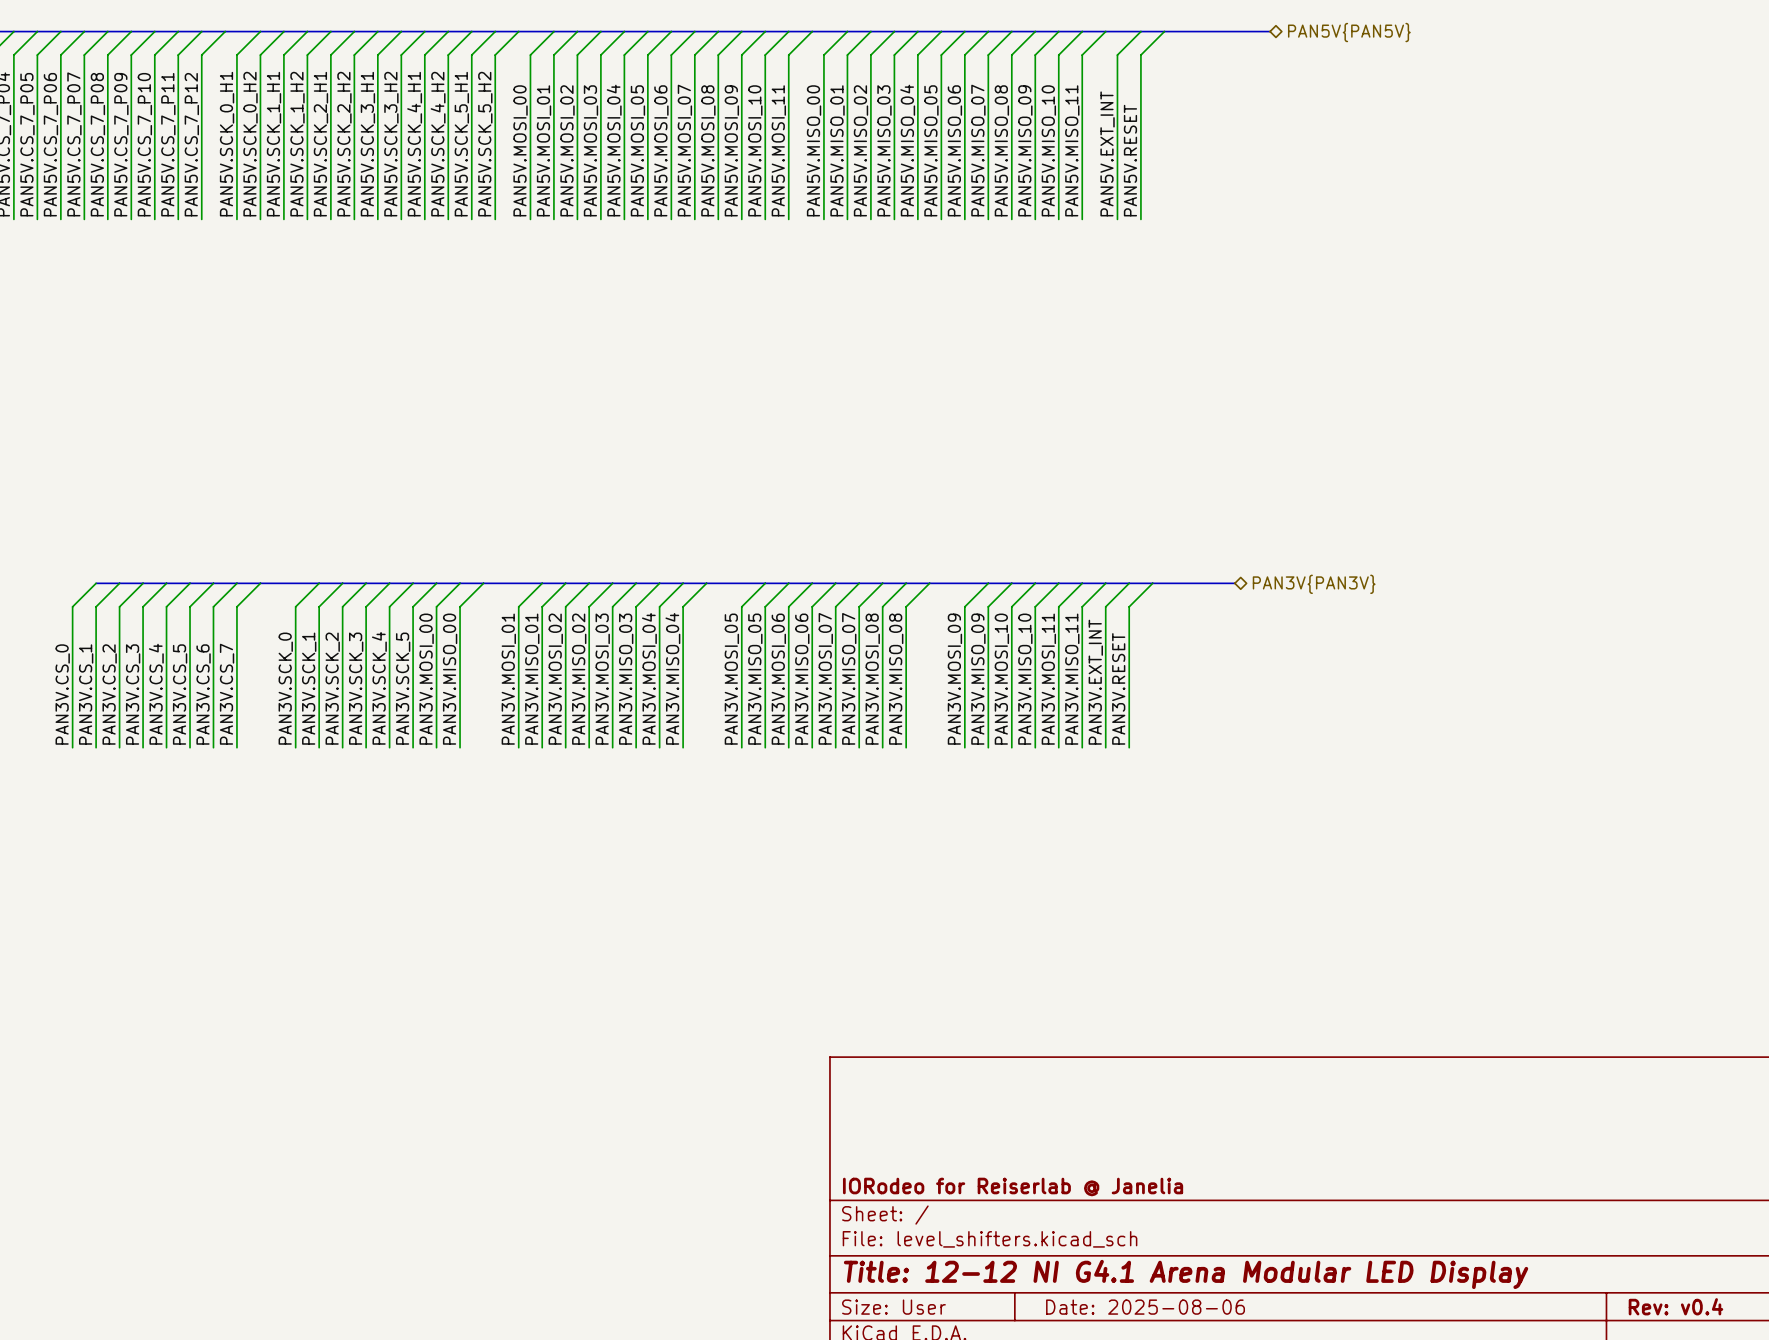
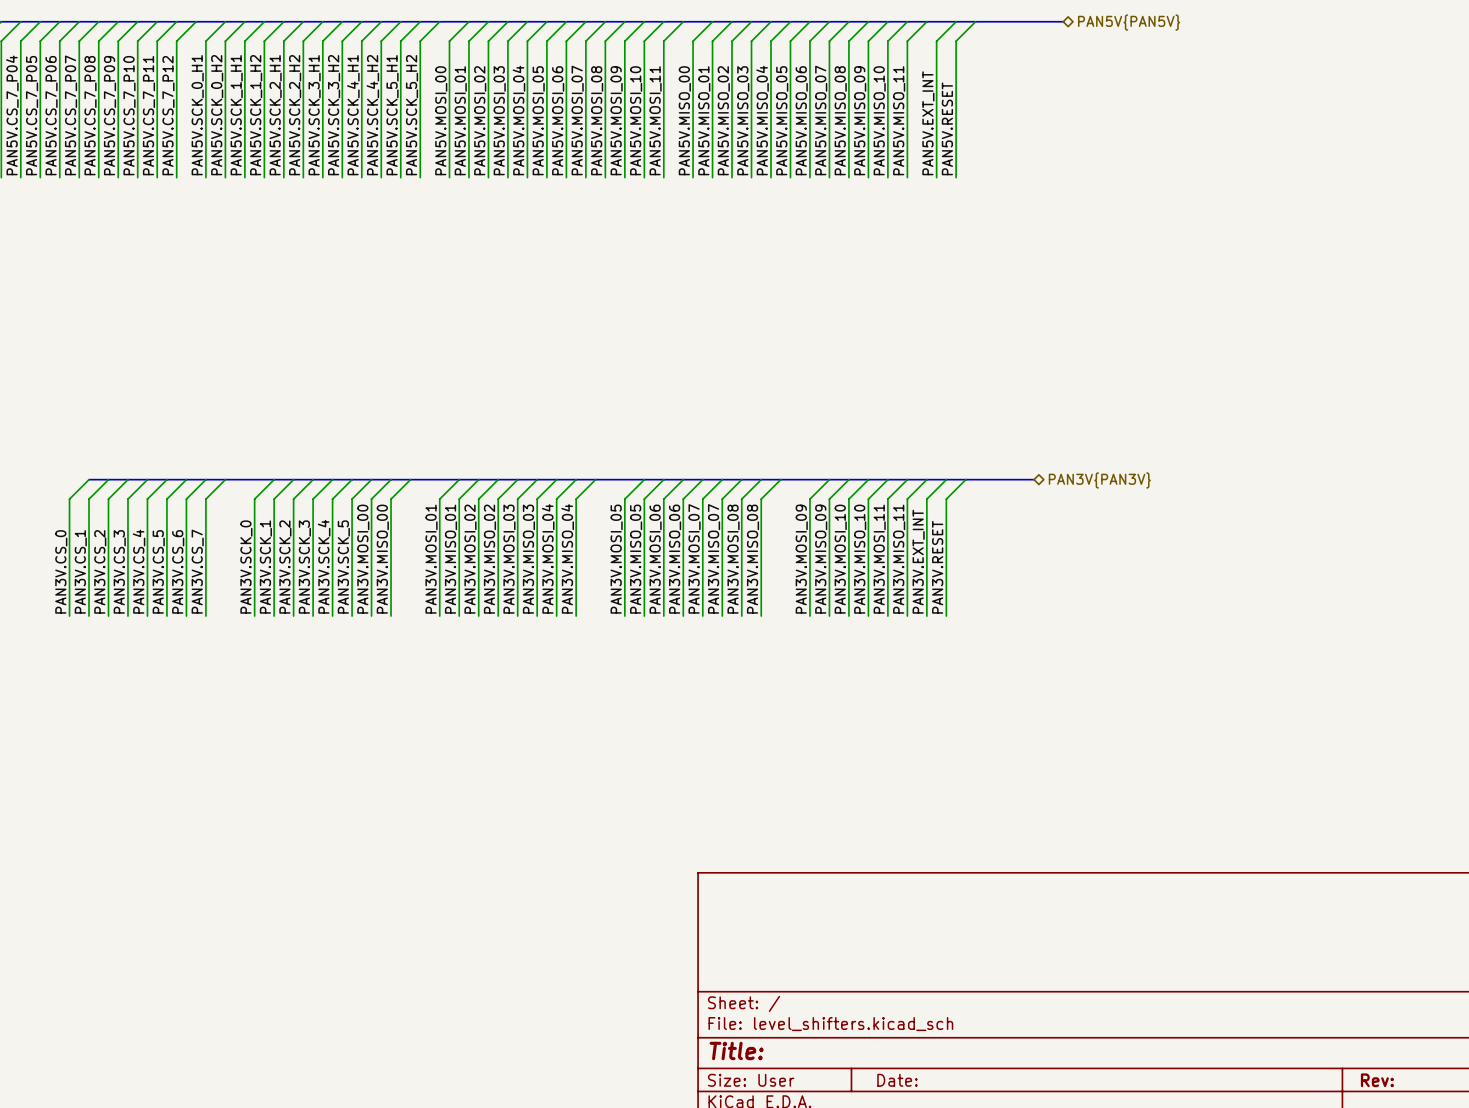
title block: IORodeo for Reiserlab @ Janelia (1013, 1186) -> none
title block: Title: 12-12 NI G4.1 Arena Modular LED Display (1186, 1274) -> Title: (736, 1050)
title block: Rev: v0.4 (1675, 1306) -> Rev: (1377, 1080)
title block: Date: 2025-08-06 (1145, 1307) -> Date: (897, 1080)

